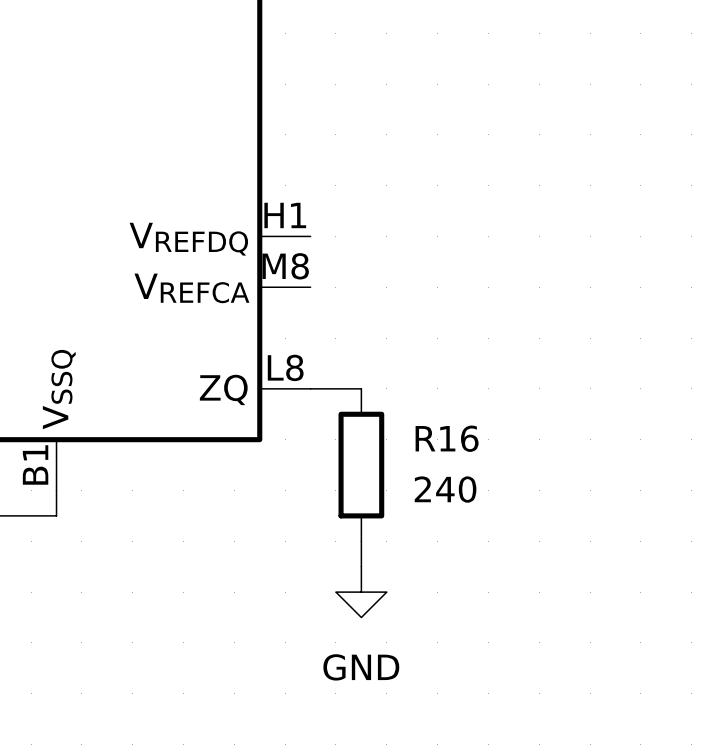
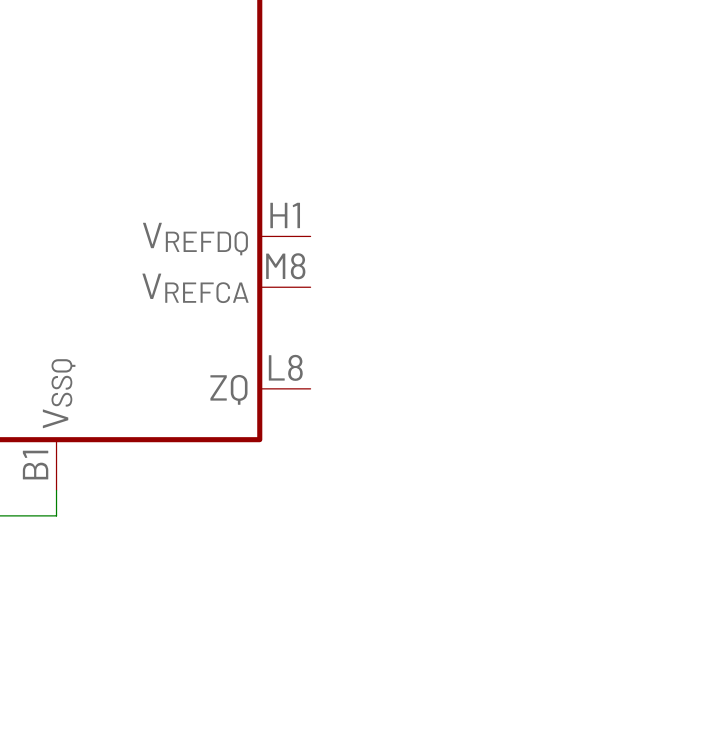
wire: (310, 388) (361, 388) -> none
R16: 240 (361, 465) -> none
wire: (361, 541) (361, 566) -> none
power symbol: GND (361, 592) -> none

